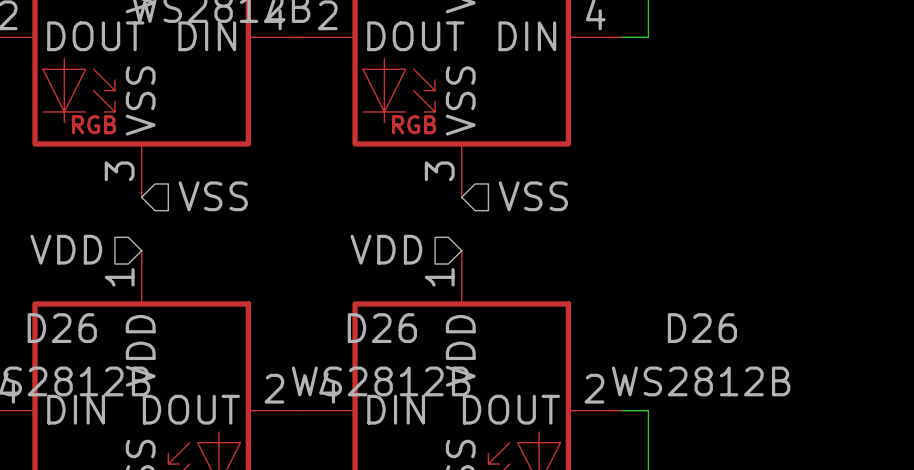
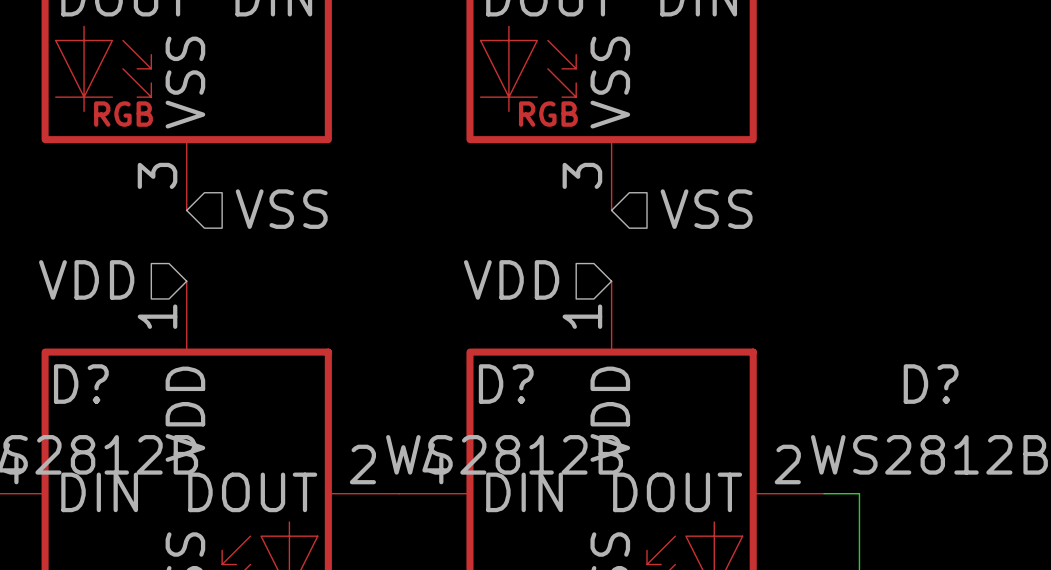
D26 name: D26 (62, 328) -> D? (81, 384)
D26 name: D26 (382, 328) -> D? (506, 384)
D26 name: D26 (702, 328) -> D? (931, 384)

